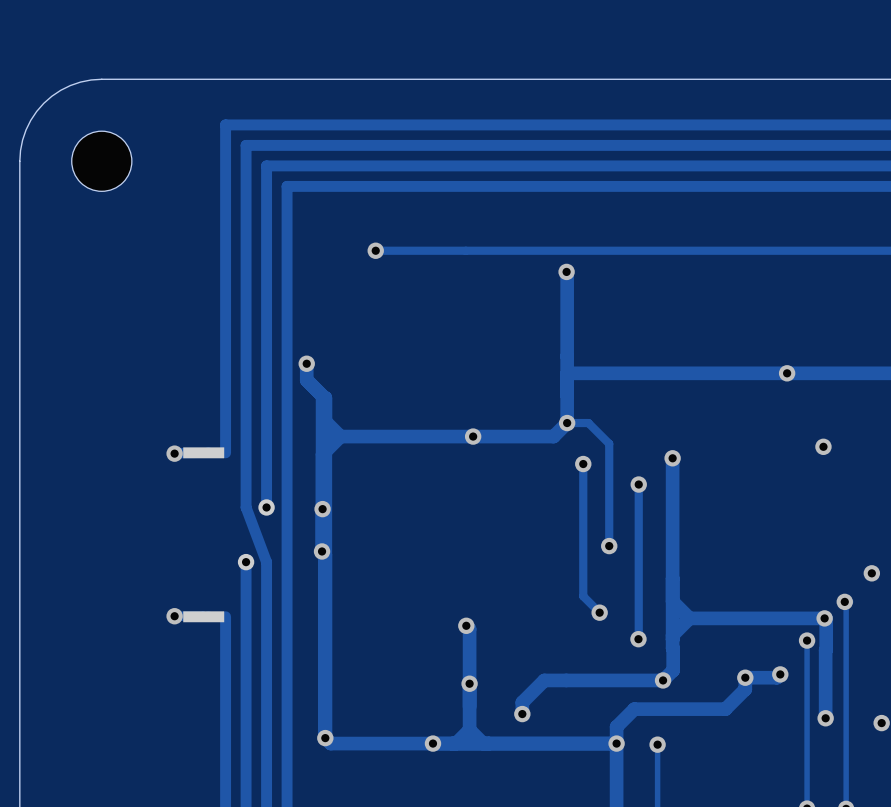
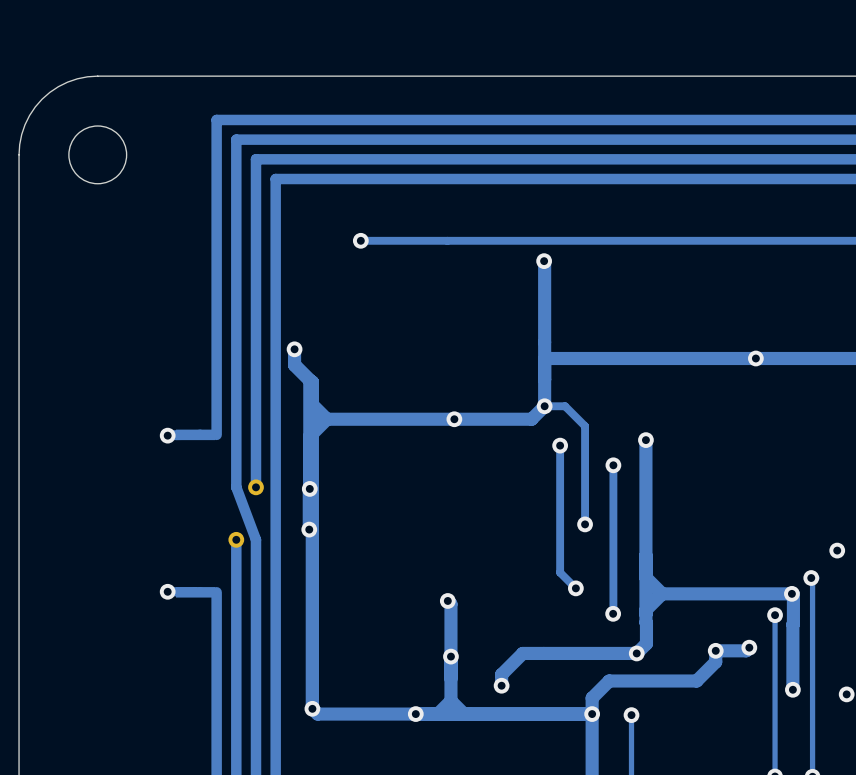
via: (823, 446) -> none

